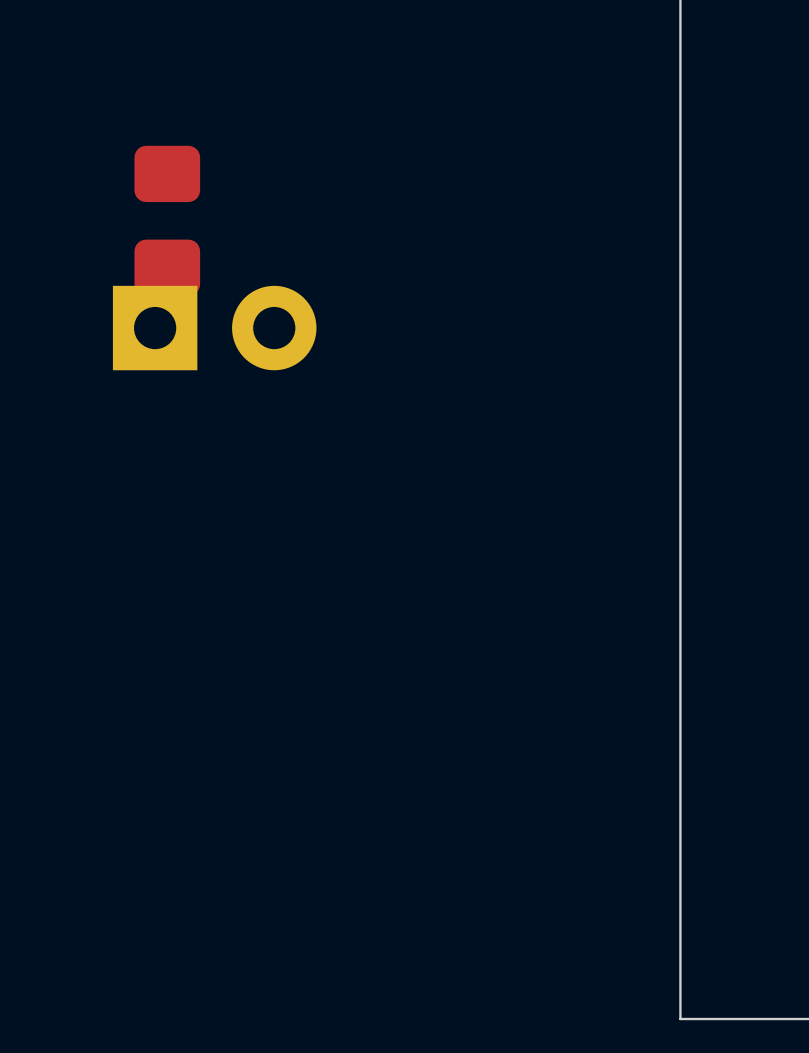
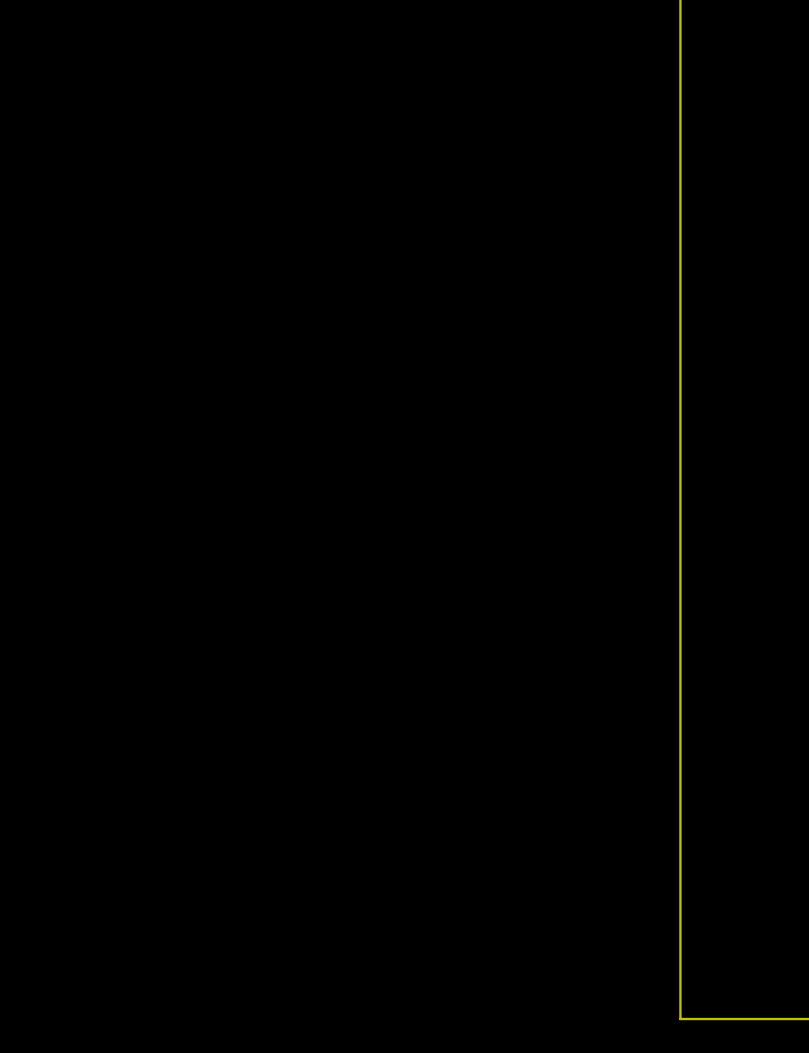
part: (167, 220) -> none
part: (214, 328) -> none

